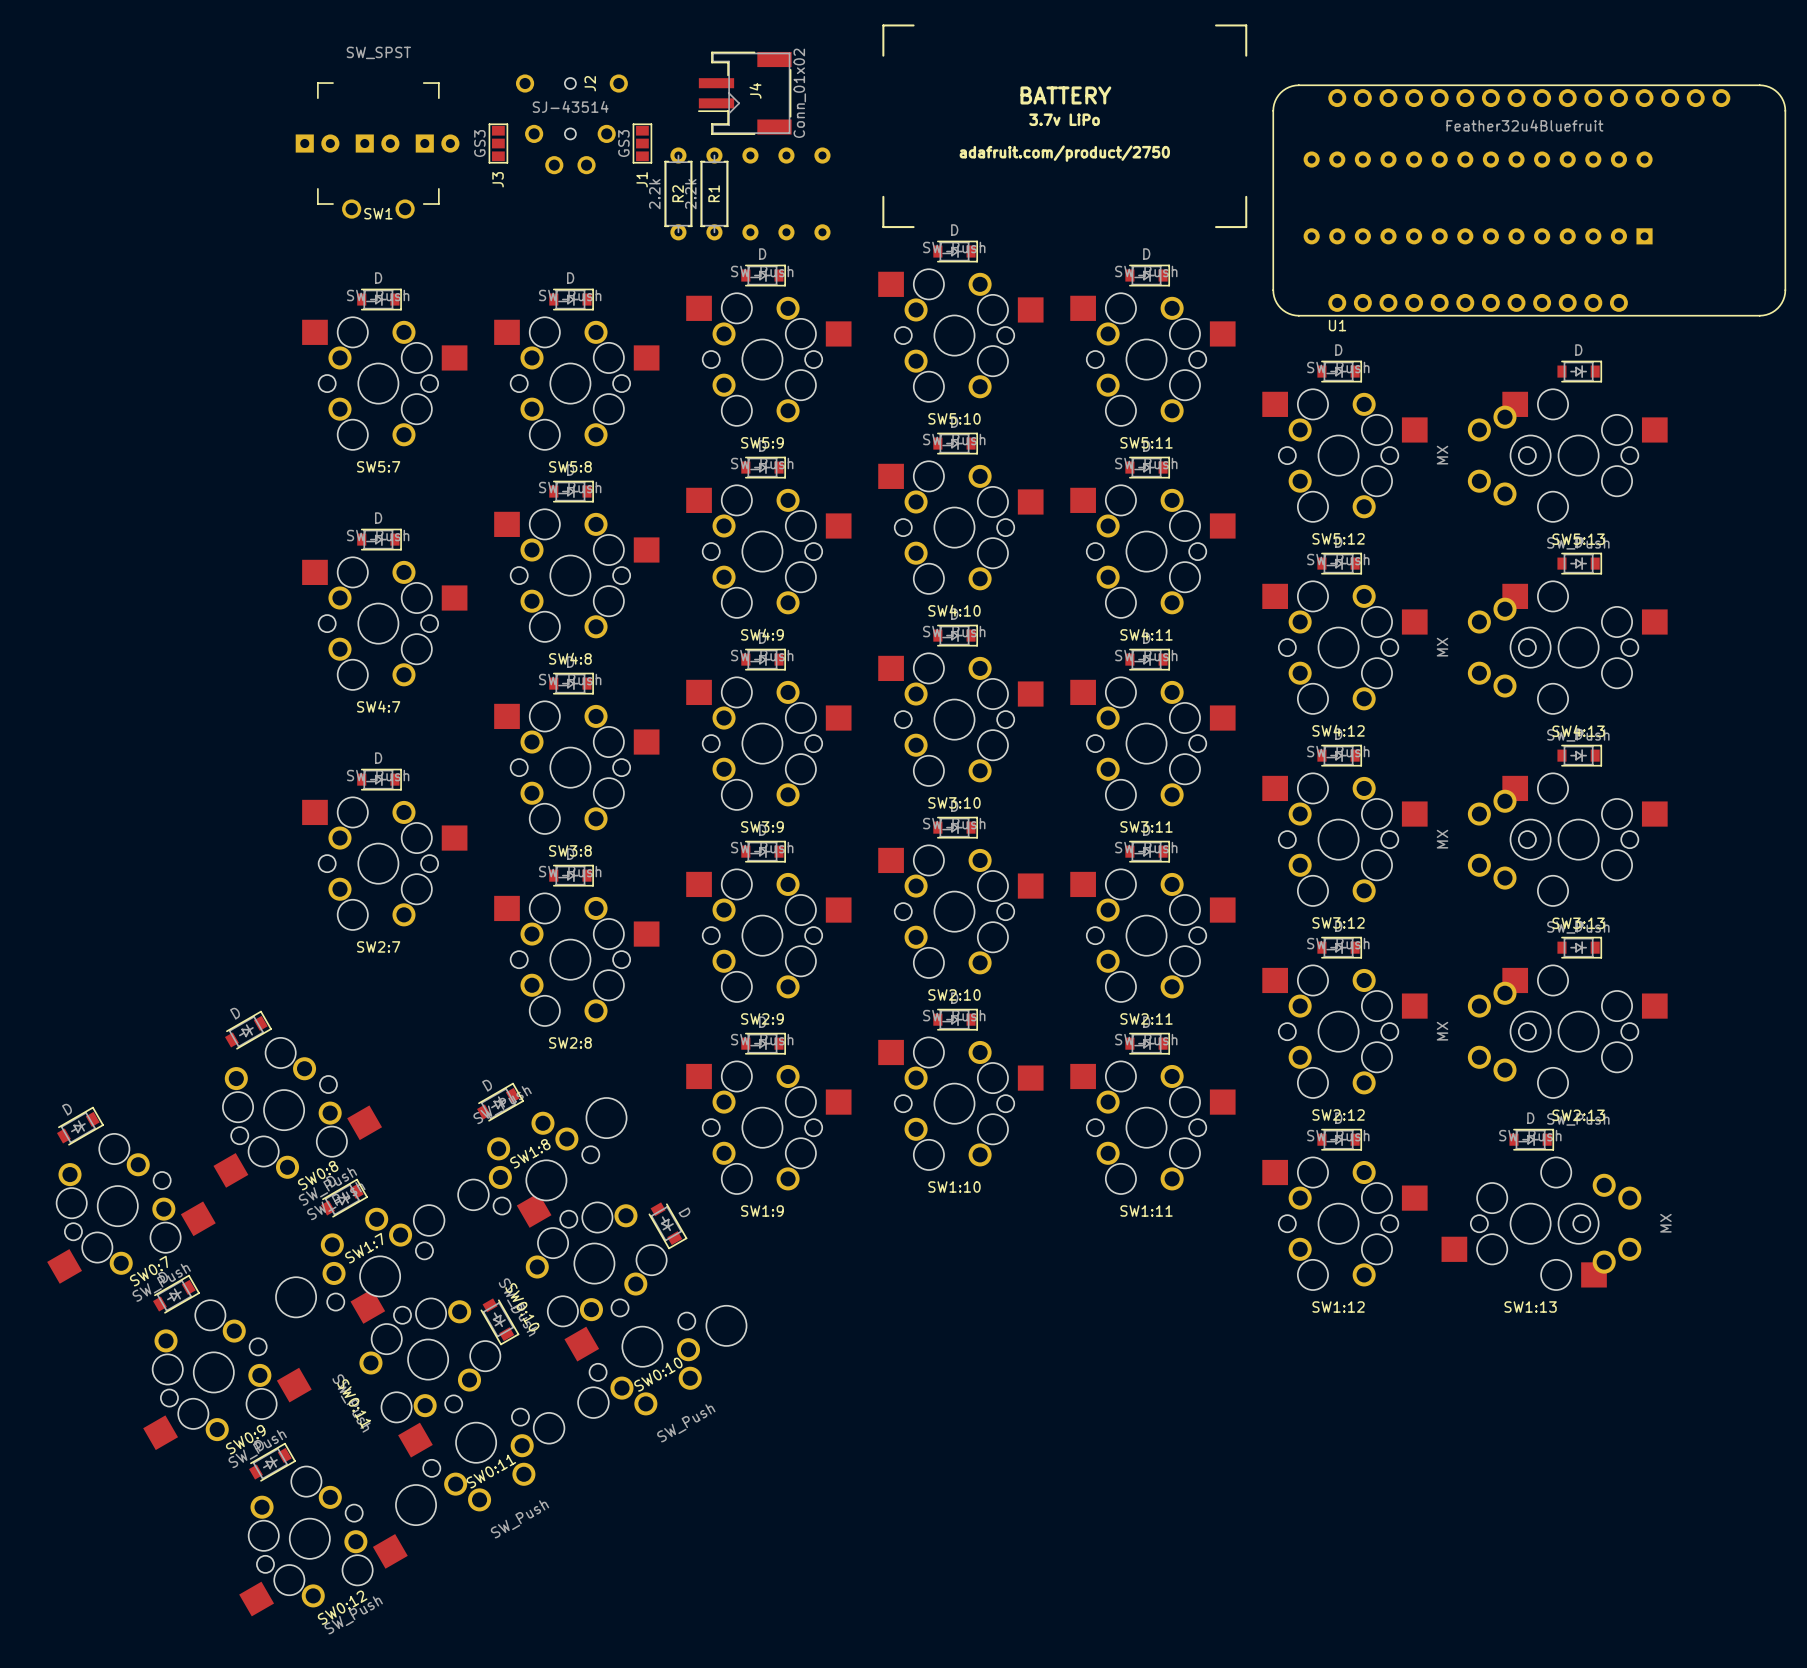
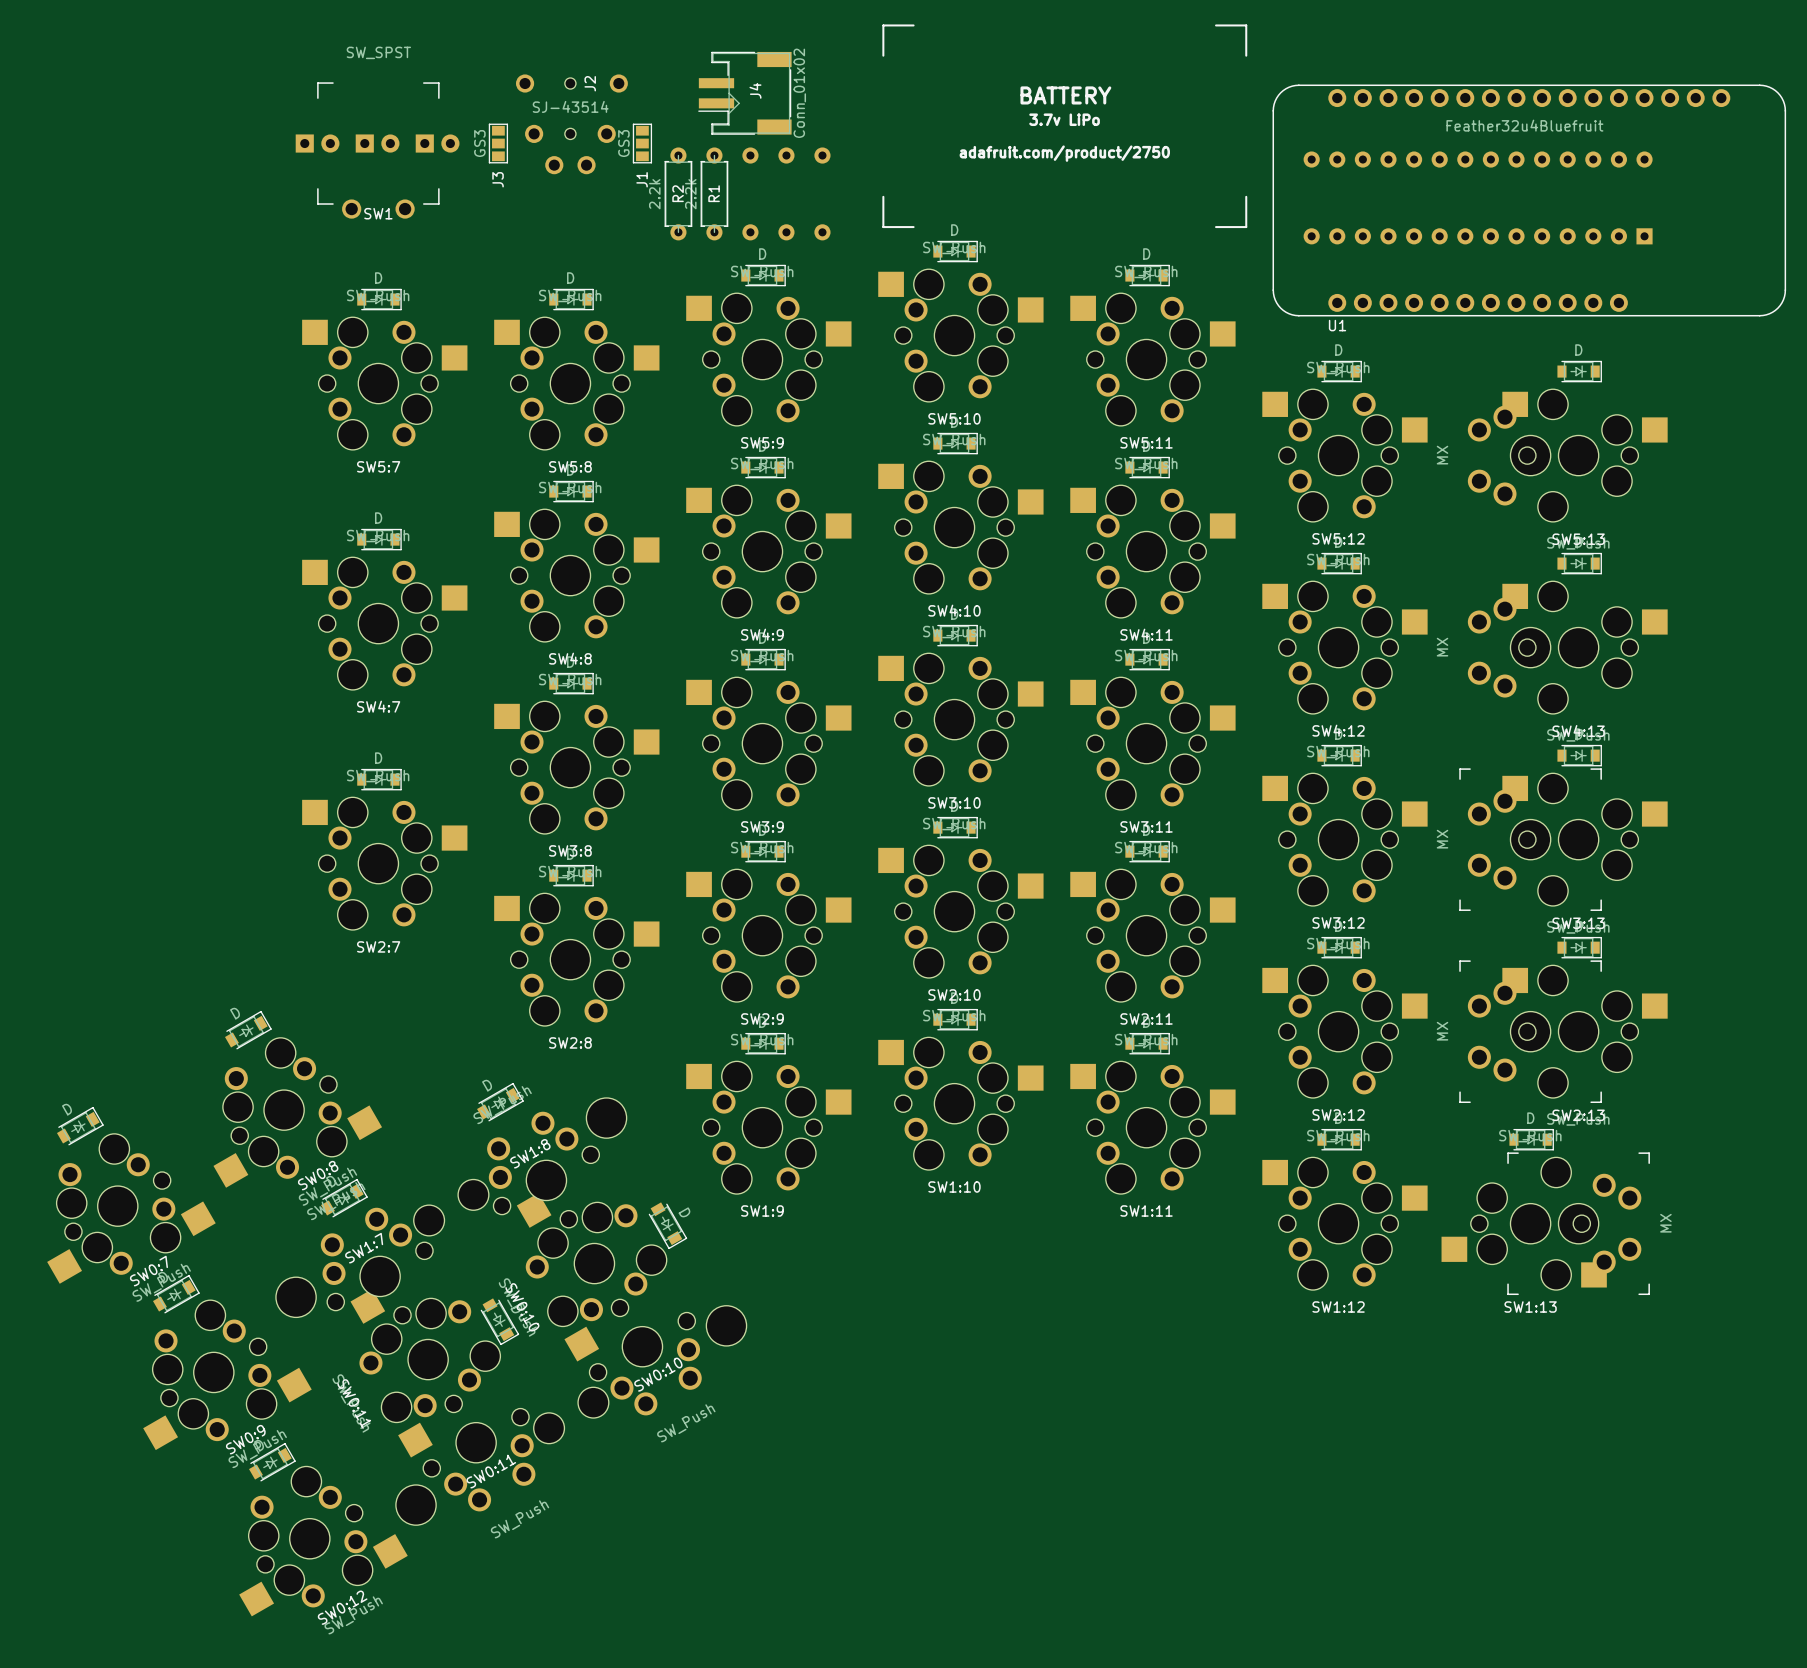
part: none -> MX (1530, 839)
part: none -> MX (1530, 1031)
part: none -> MX (1578, 1223)

